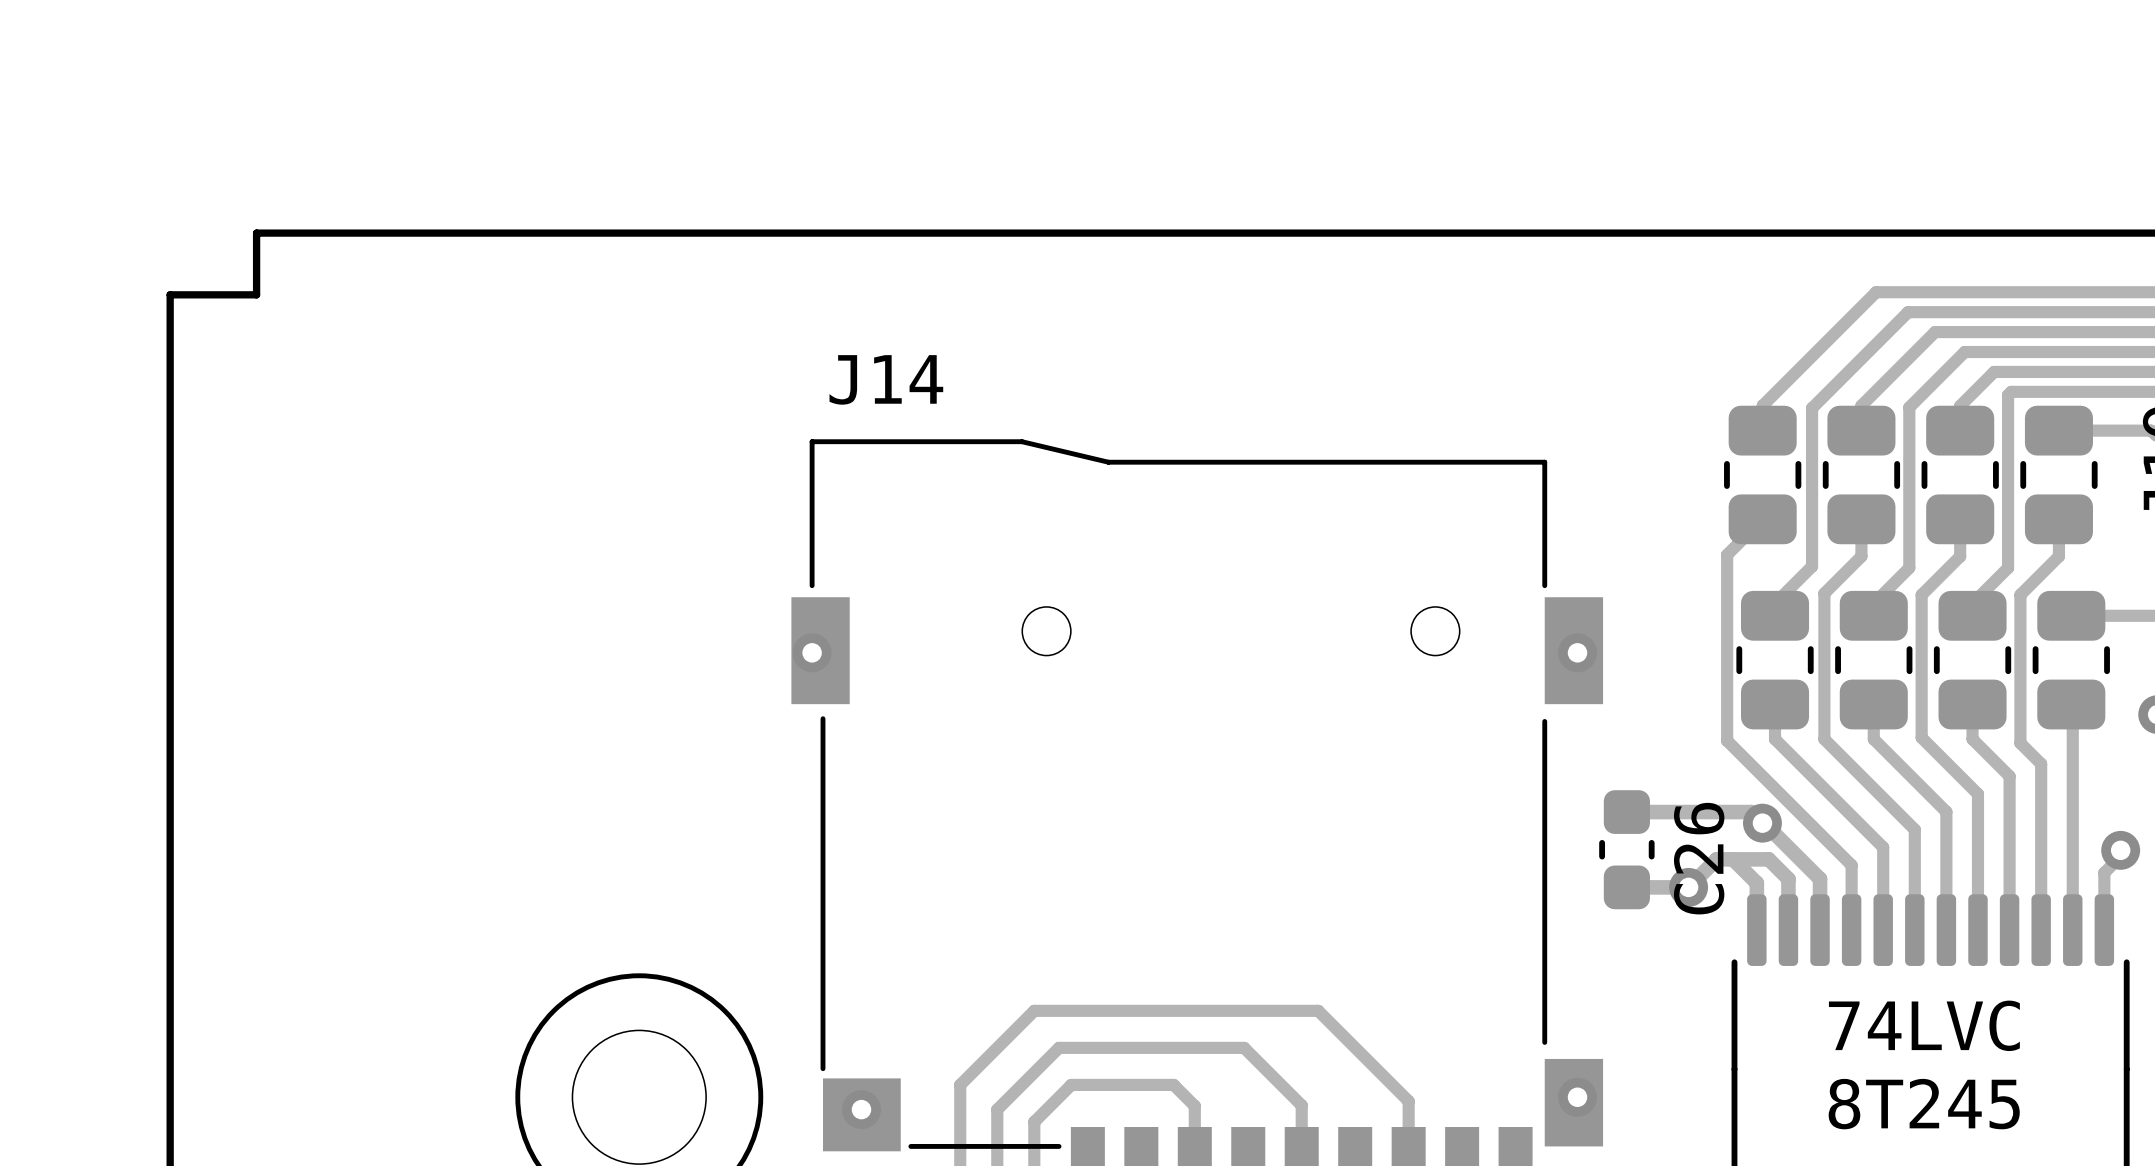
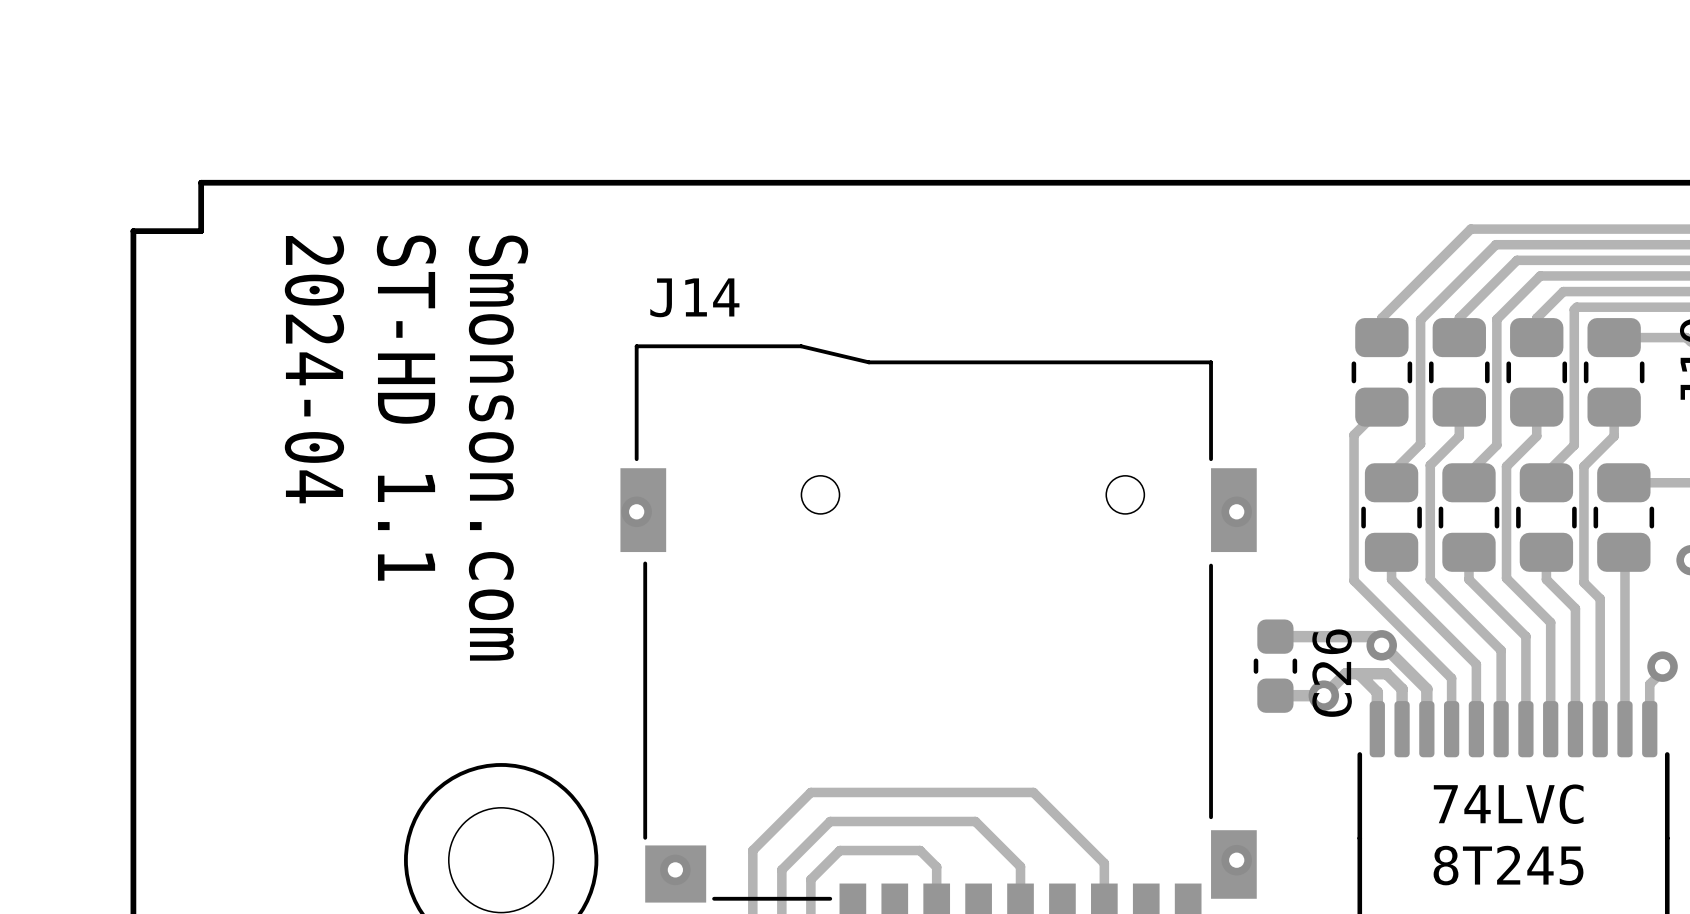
text: none -> 2024-04 (314, 369)
text: none -> ST-HD 1.1 (406, 408)
text: none -> Smonson.com (498, 448)

